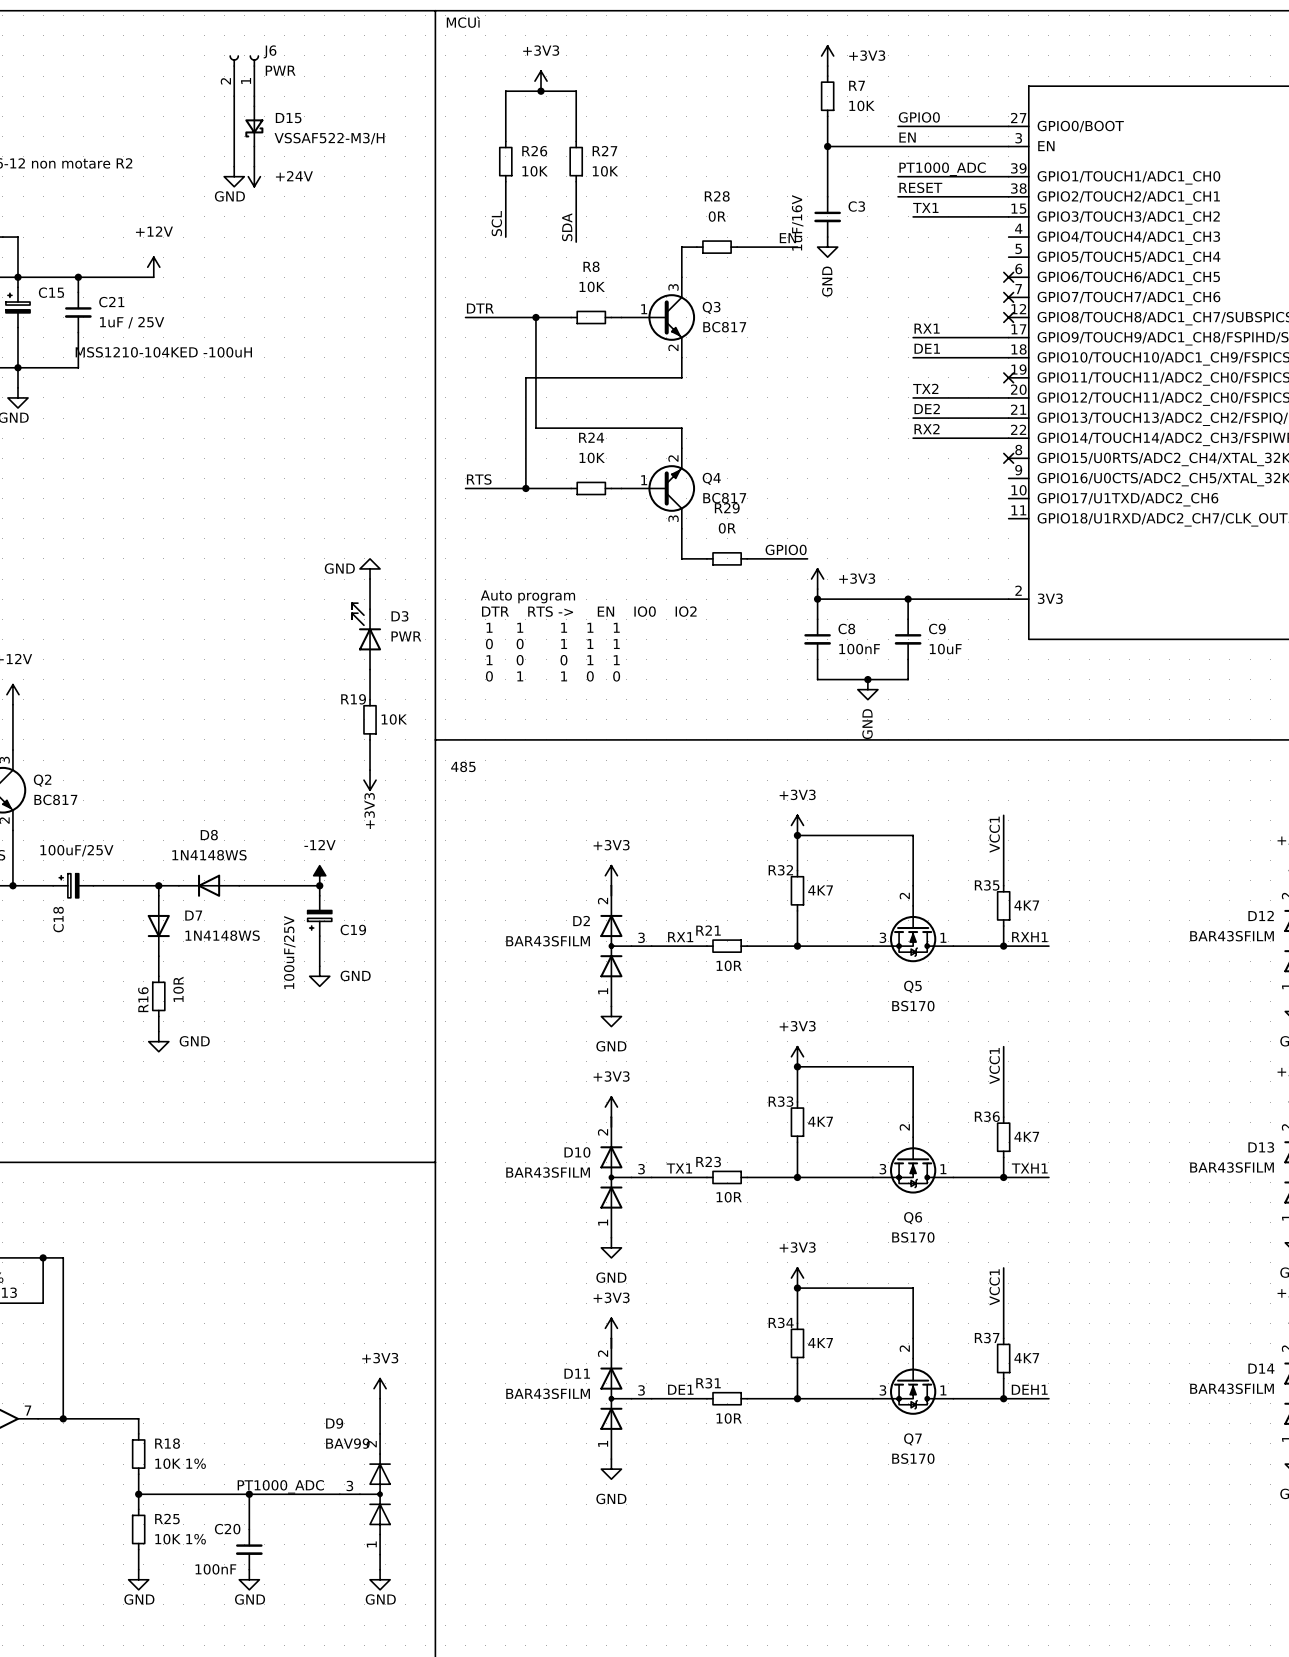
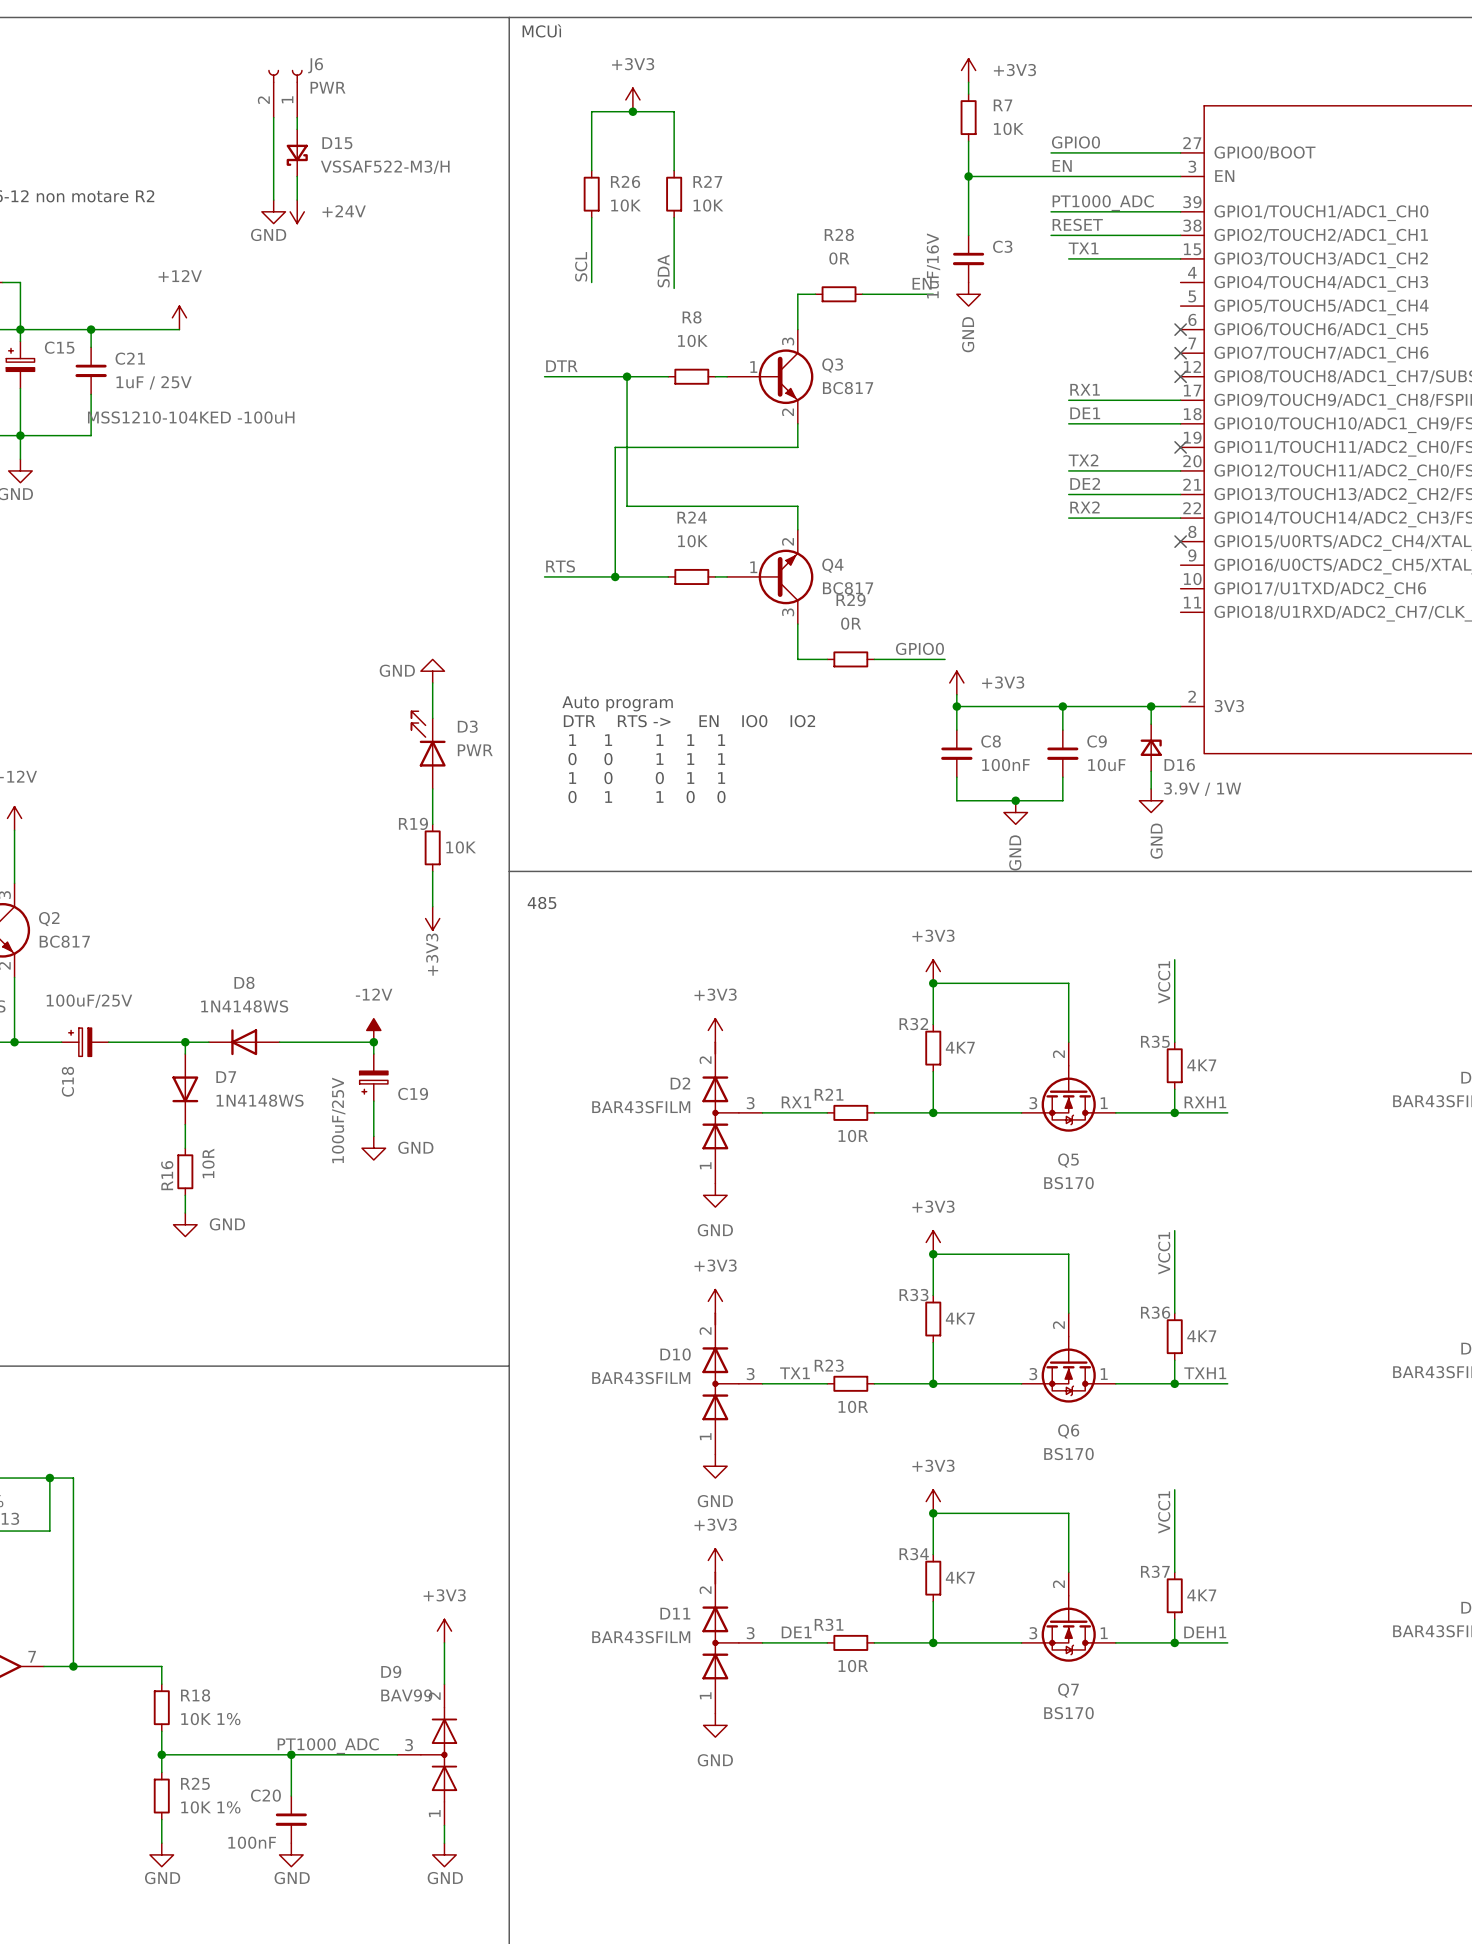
wire: none -> (1151, 706) (1151, 724)
junction: none -> (1151, 706)
D16: none -> 3.9V / 1W (1151, 747)
wire: none -> (1151, 771) (1151, 788)
power symbol: none -> GND (1151, 800)

